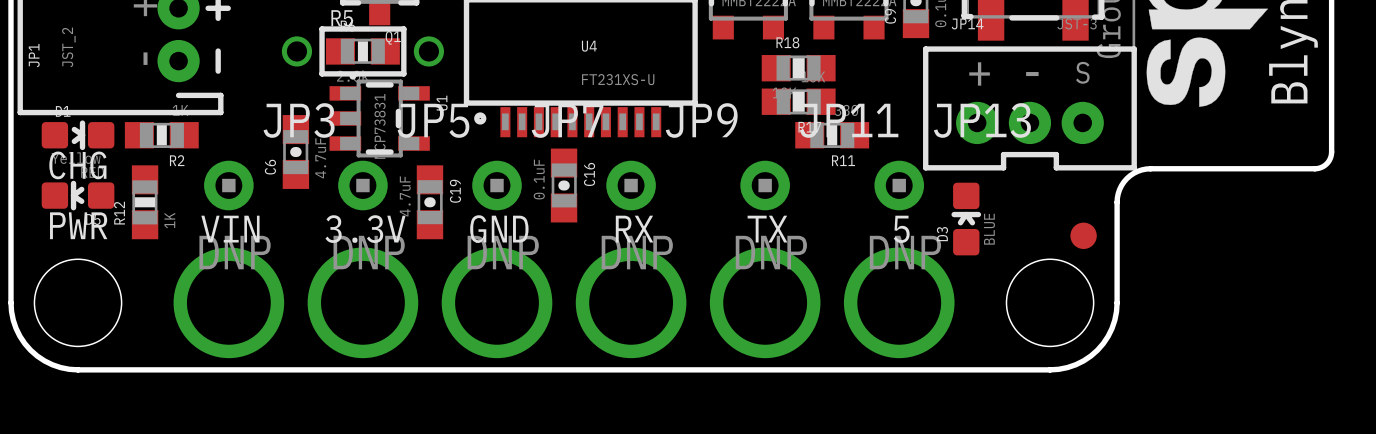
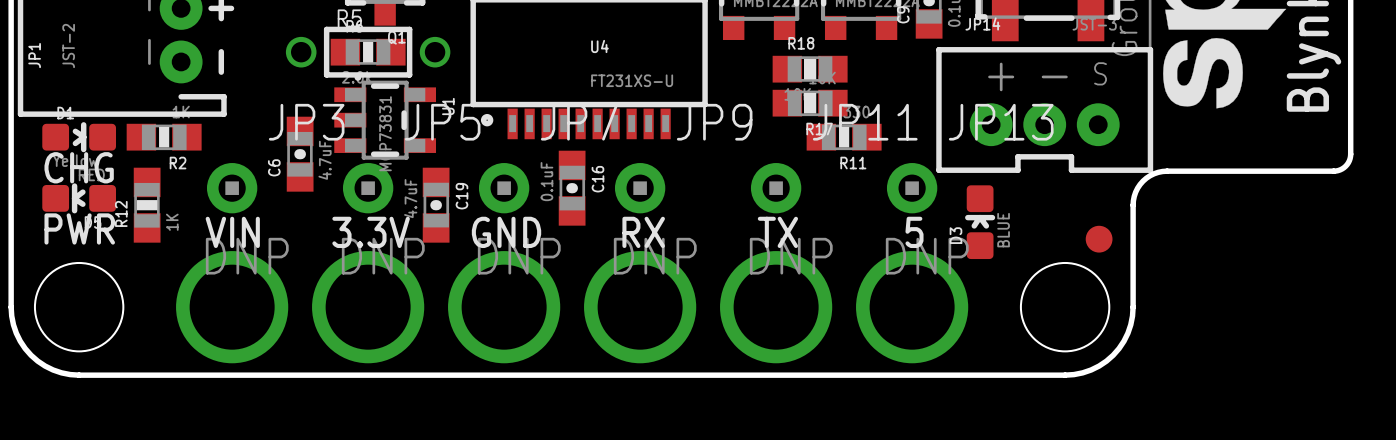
JP1 value: JST_2 (68, 47) -> JST-2 (68, 45)

